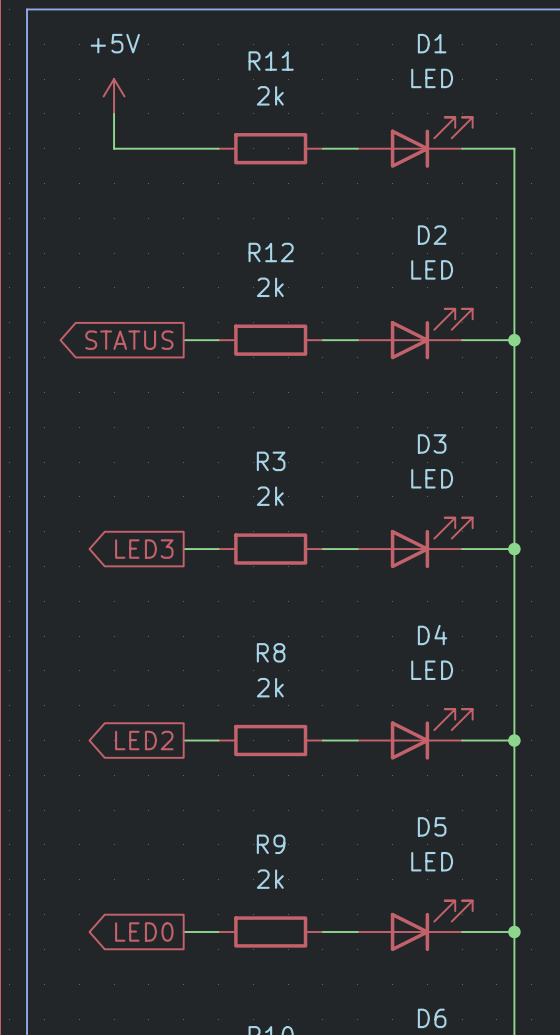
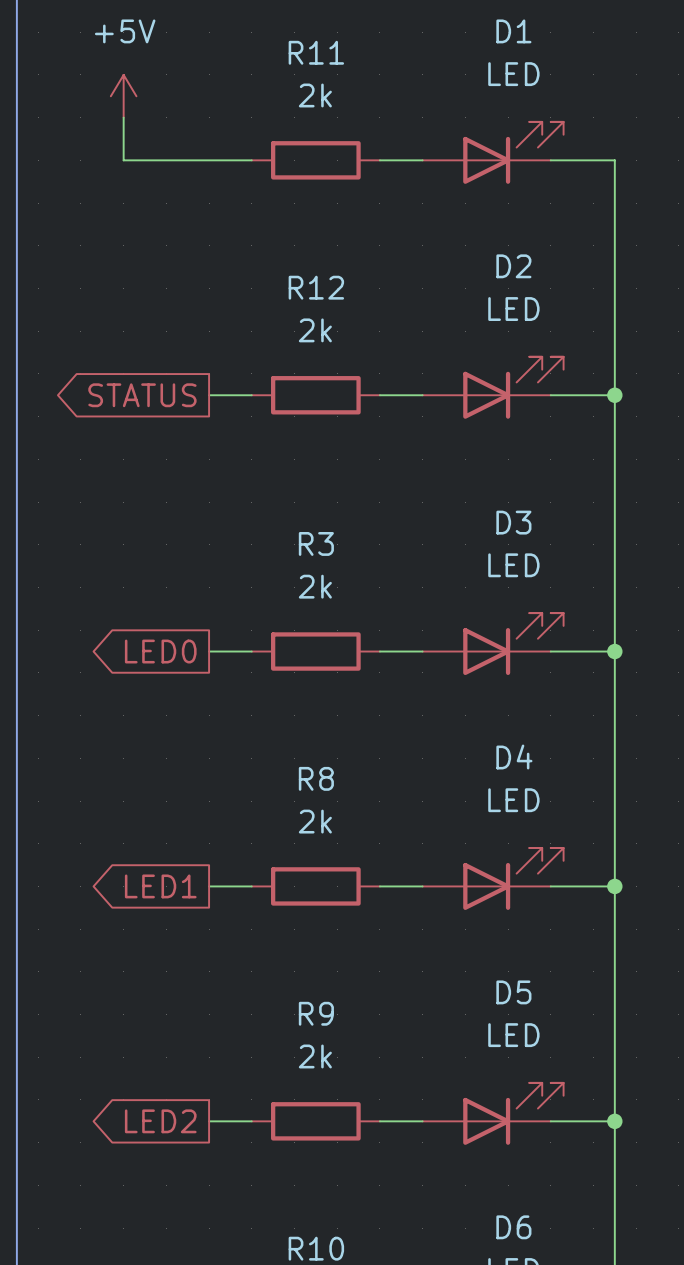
global label: LED3 (144, 549) -> LED0 (160, 651)
global label: LED2 (144, 740) -> LED1 (160, 886)
global label: LED0 (144, 931) -> LED2 (160, 1121)

